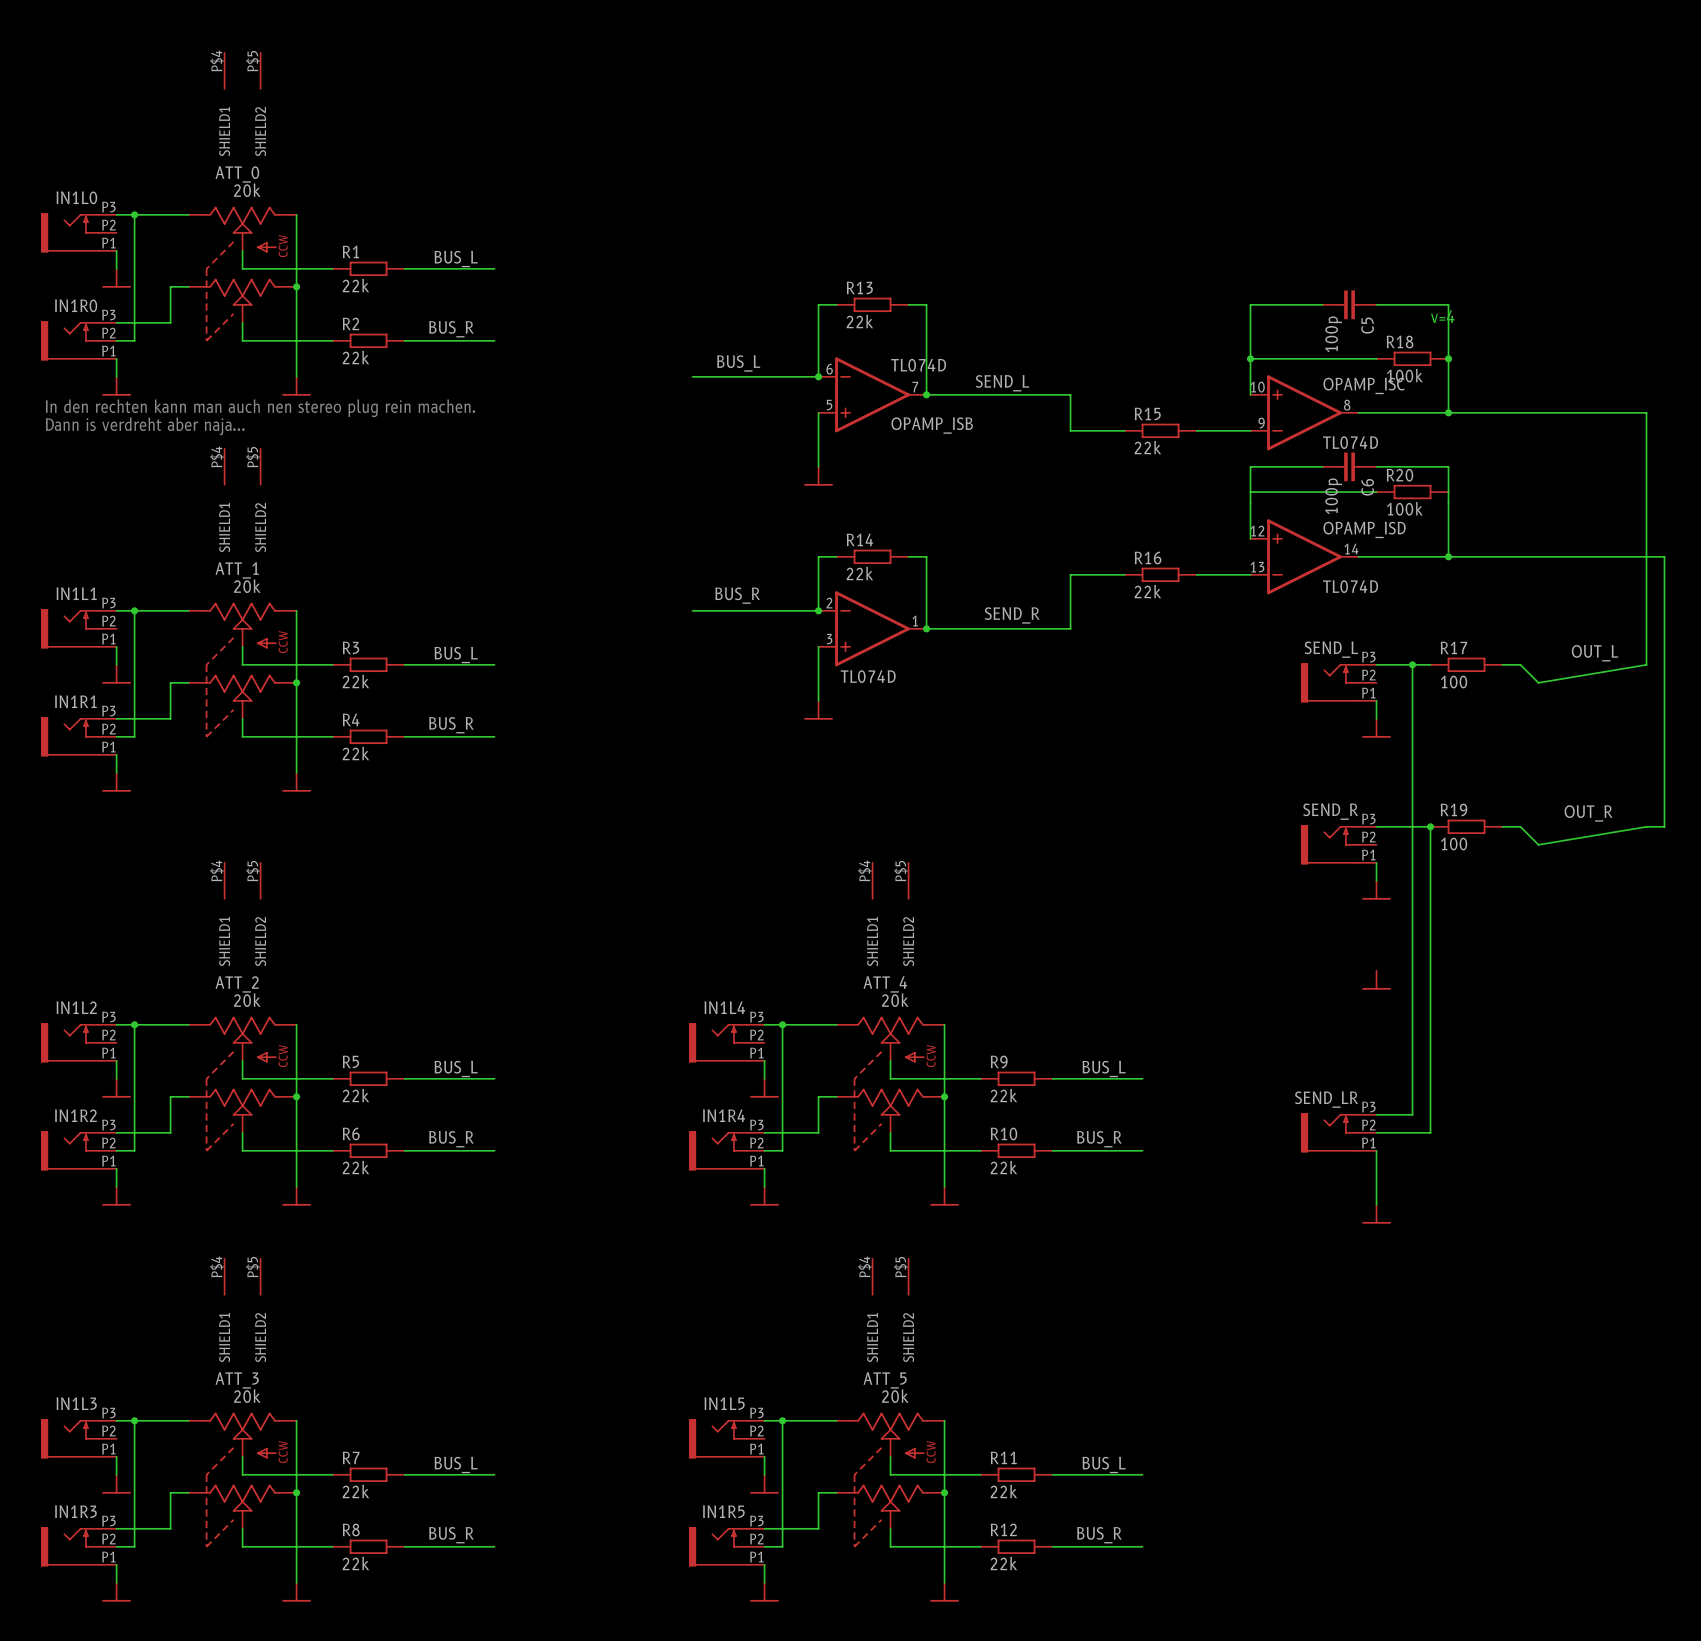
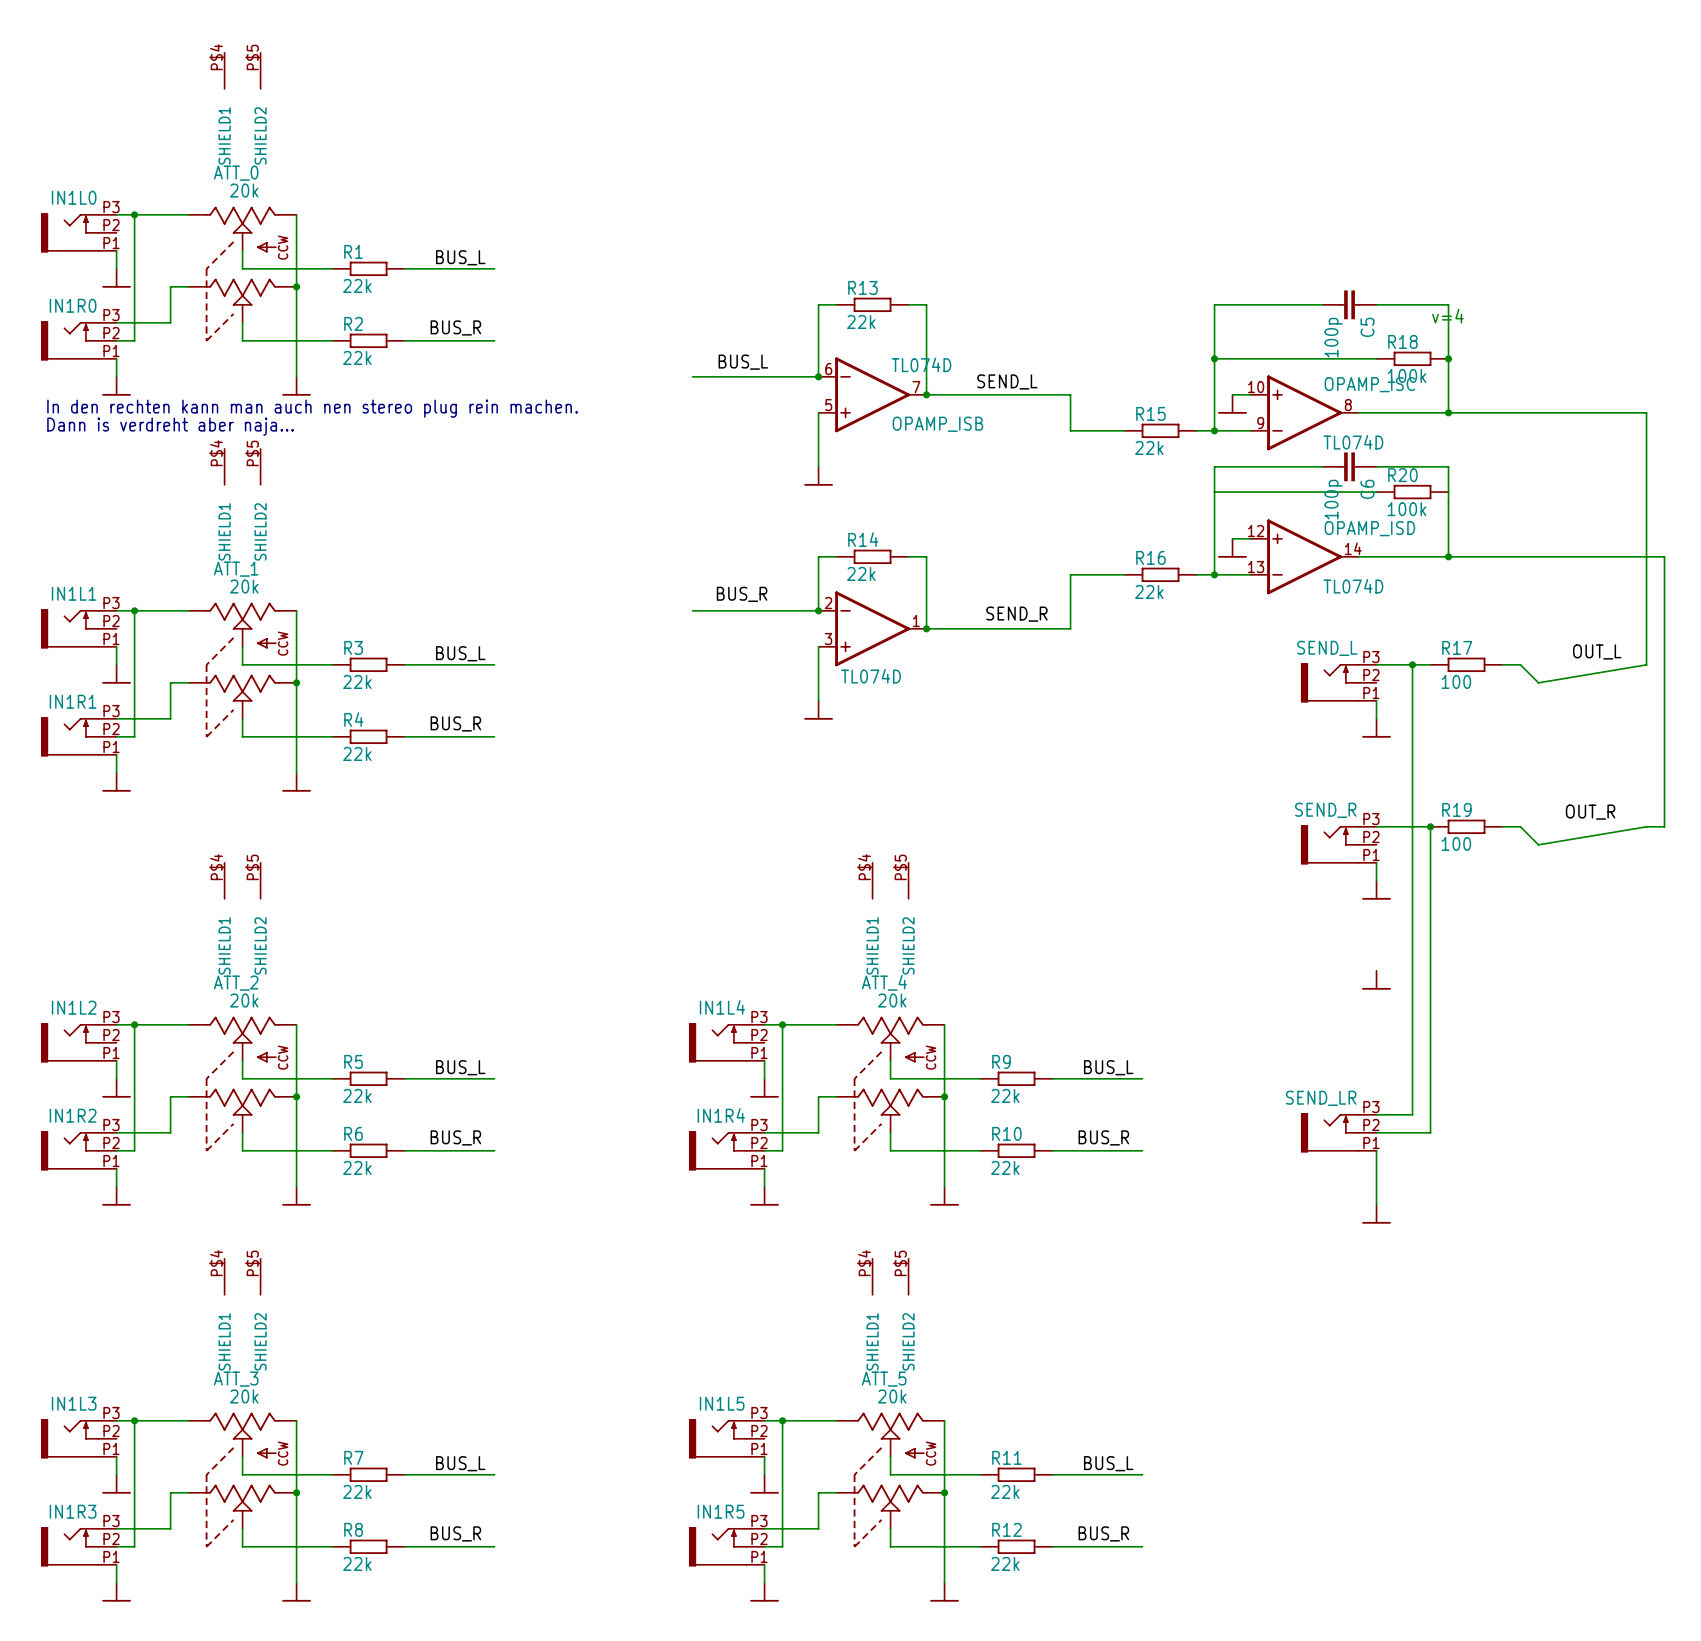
wire: (1250, 304) (1250, 394) -> (1250, 304) (1214, 304) (1214, 430)
wire: none -> (1214, 358) (1250, 358)
junction position: (1250, 358) -> (1214, 358)
wire: none -> (1232, 394) (1250, 394)
power symbol: none -> (1232, 404)
junction: none -> (1214, 430)
wire: (1250, 466) (1250, 538) -> (1250, 466) (1214, 466) (1214, 574)
wire: none -> (1214, 492) (1250, 492)
wire: none -> (1232, 538) (1250, 538)
power symbol: none -> (1232, 548)
junction: none -> (1214, 574)

